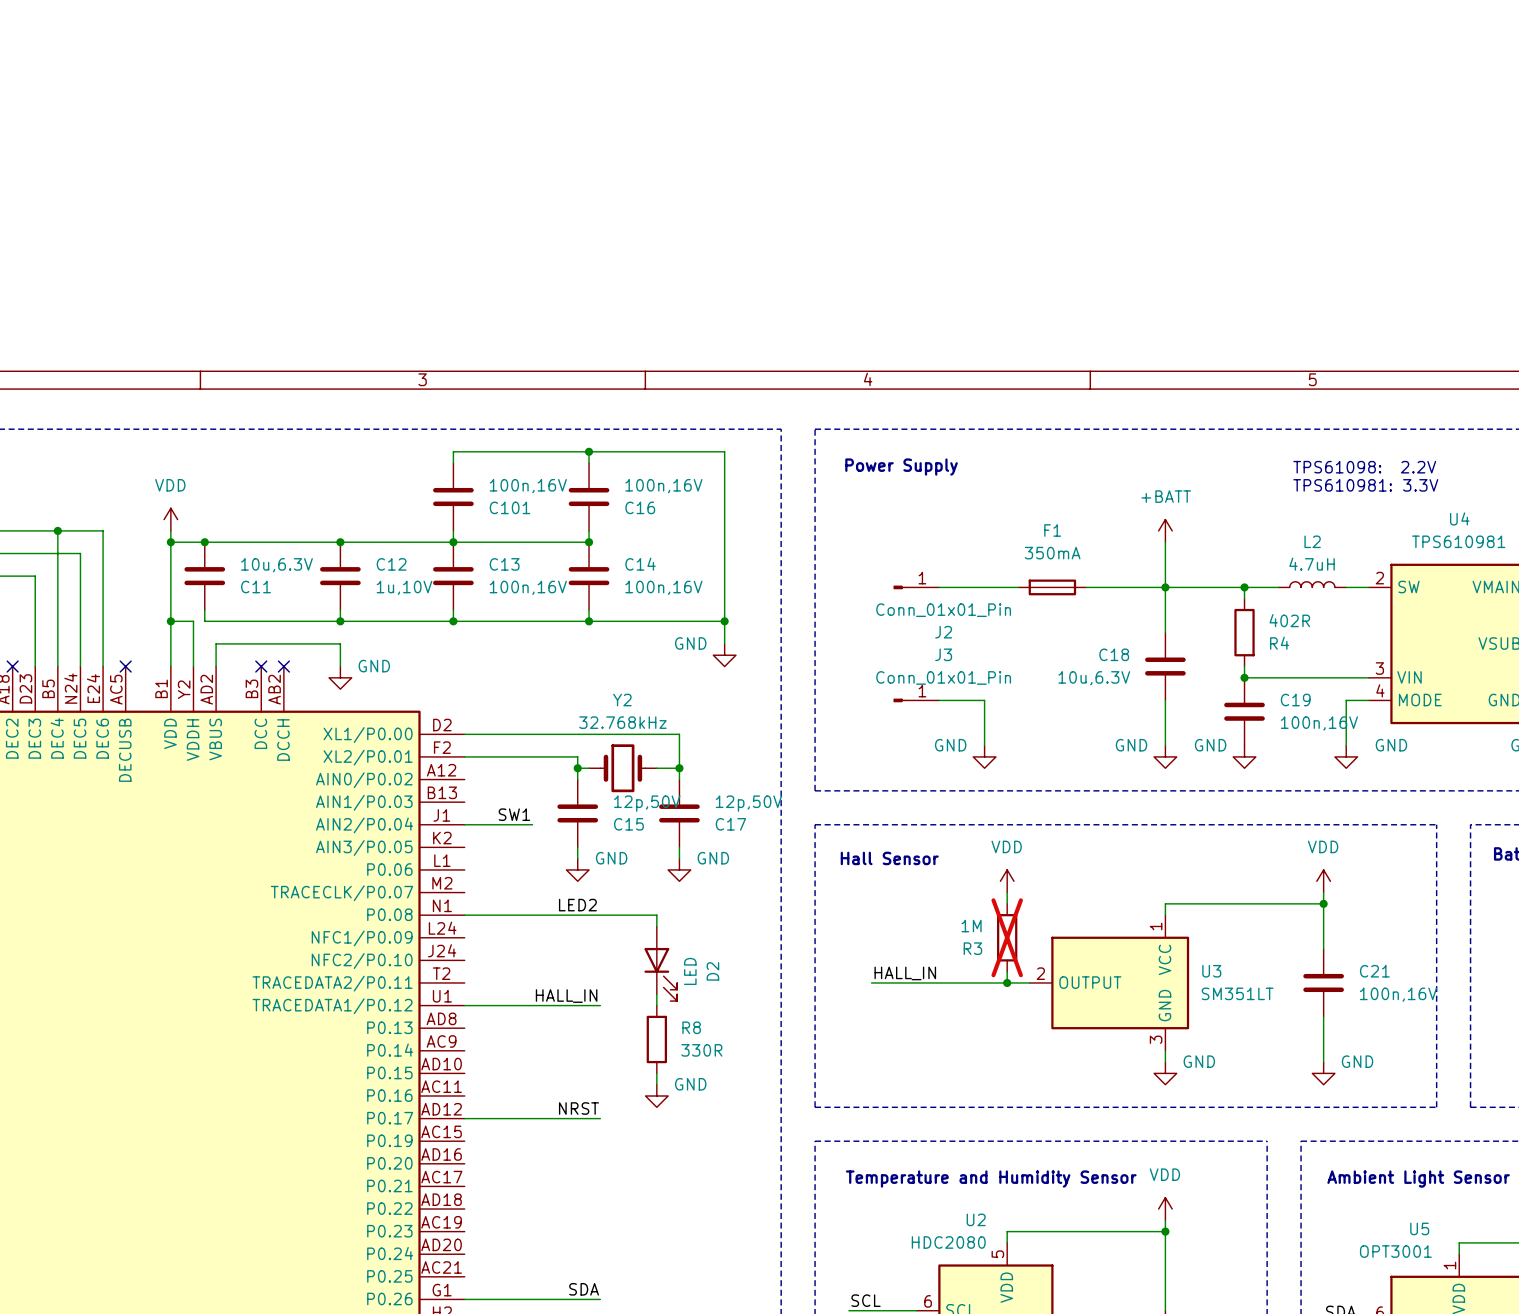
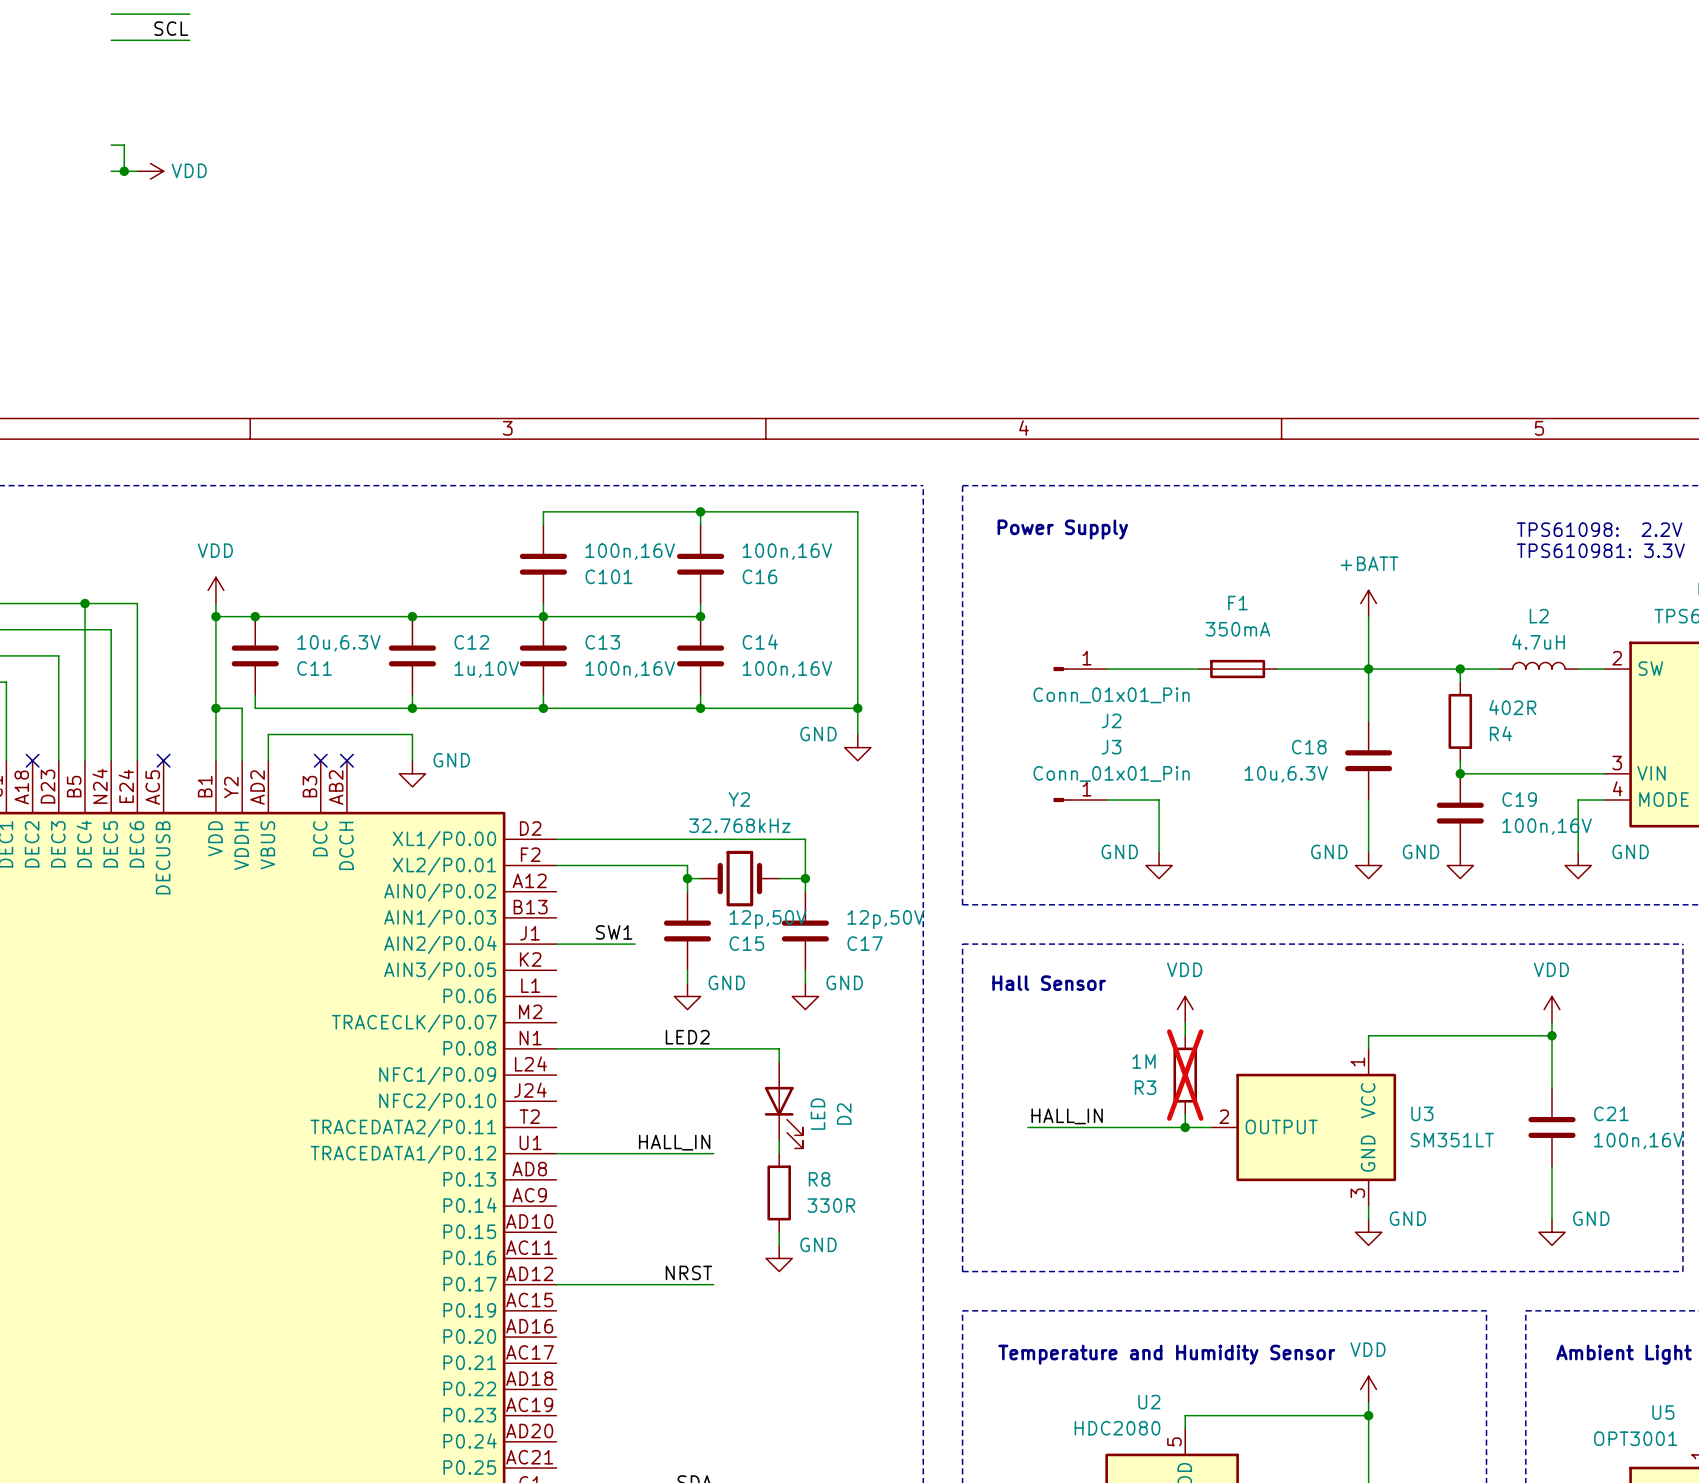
wire: none -> (111, 14) (189, 14)
label: none -> SCL (171, 28)
wire: none -> (111, 40) (189, 40)
wire: none -> (111, 145) (124, 145) (124, 171)
wire: none -> (111, 171) (137, 171)
junction: none -> (124, 171)
power symbol: none -> VDD (150, 171)

